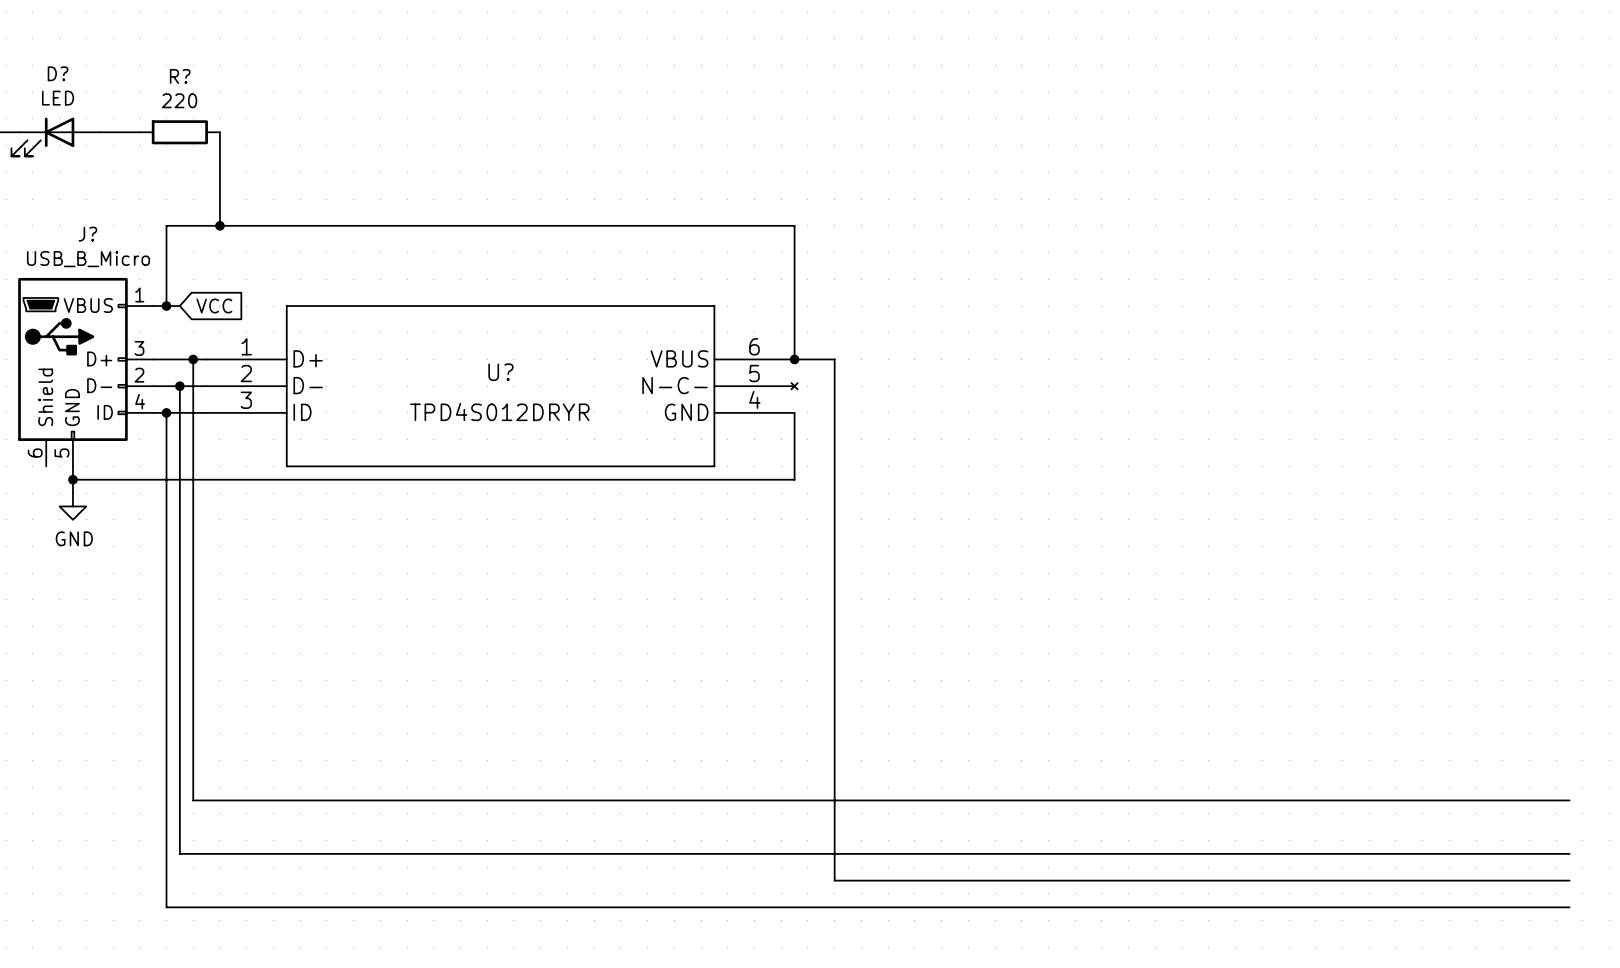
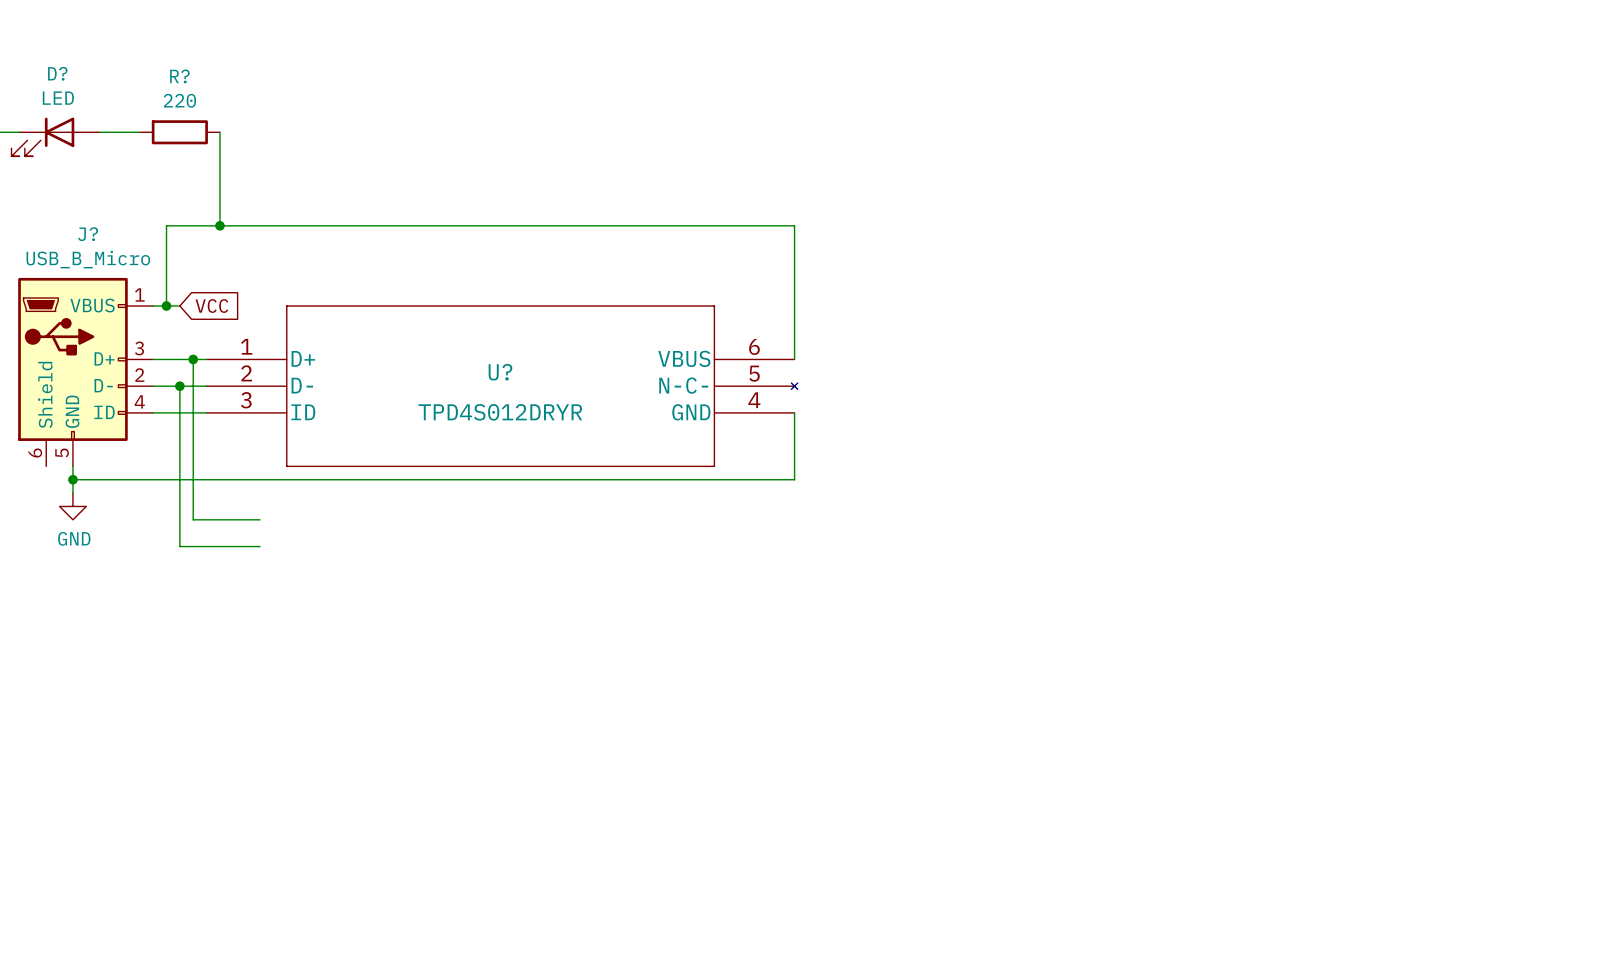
wire: (794, 359) (834, 359) (834, 880) (1569, 880) -> none
junction: (794, 359) -> none
wire: (166, 412) (166, 907) (1569, 907) -> none
junction: (166, 412) -> none
wire: (193, 519) (193, 800) (1569, 800) -> (193, 519) (260, 519)
wire: (179, 546) (179, 853) (1569, 853) -> (179, 546) (260, 546)

